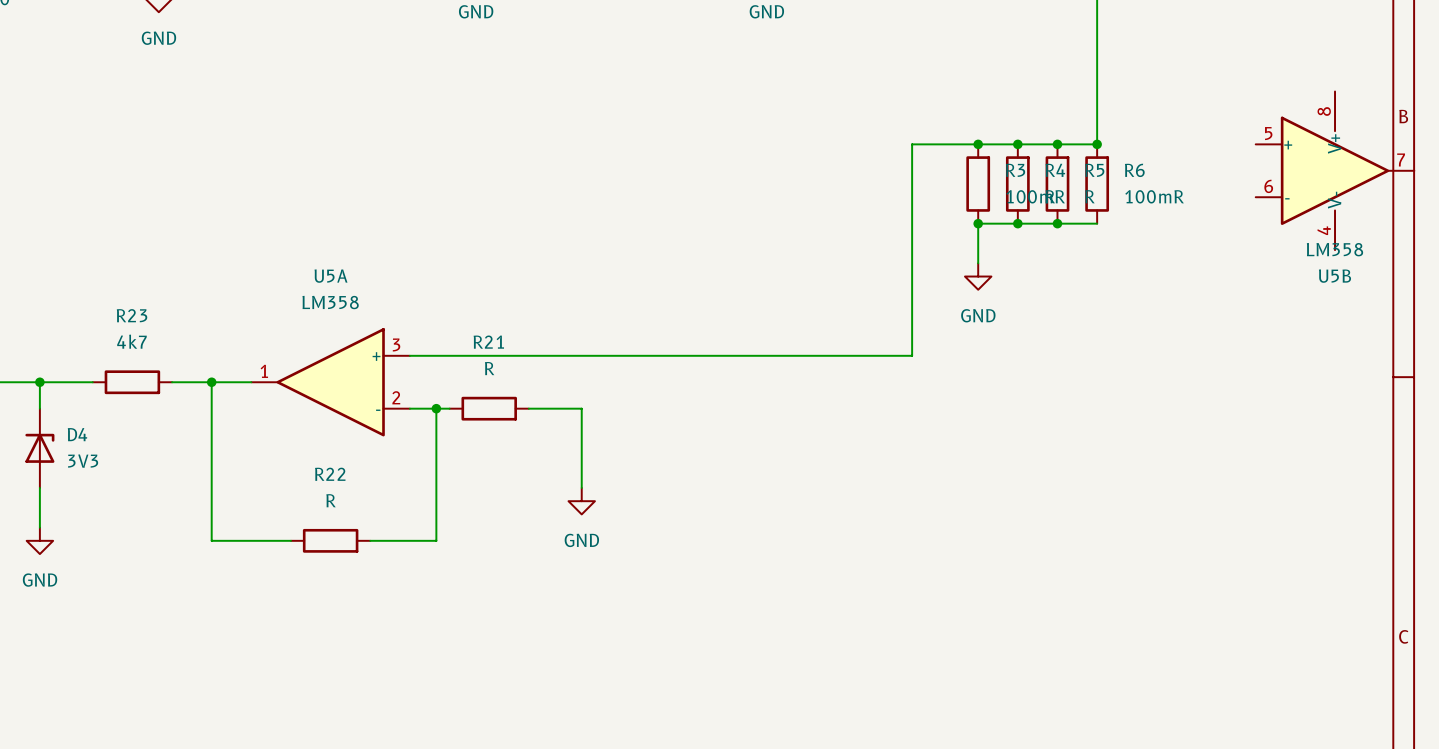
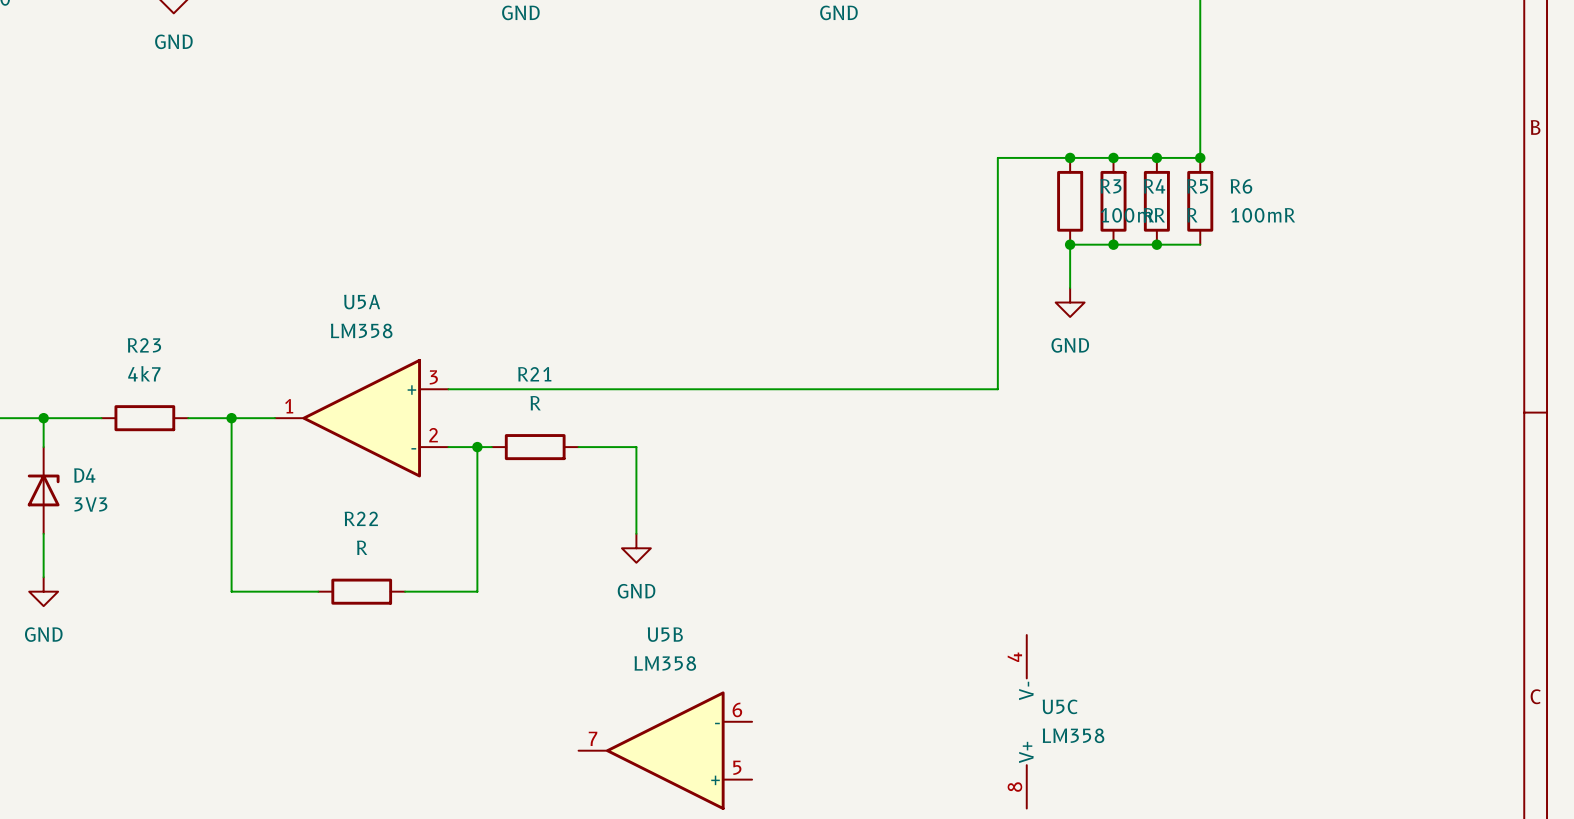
U5B rotation: 0° (1335, 170) -> 180° (665, 750)
U5B position: (1335, 170) -> (665, 750)
part: (1335, 170) -> none
U5C: none -> LM358 (1026, 721)

